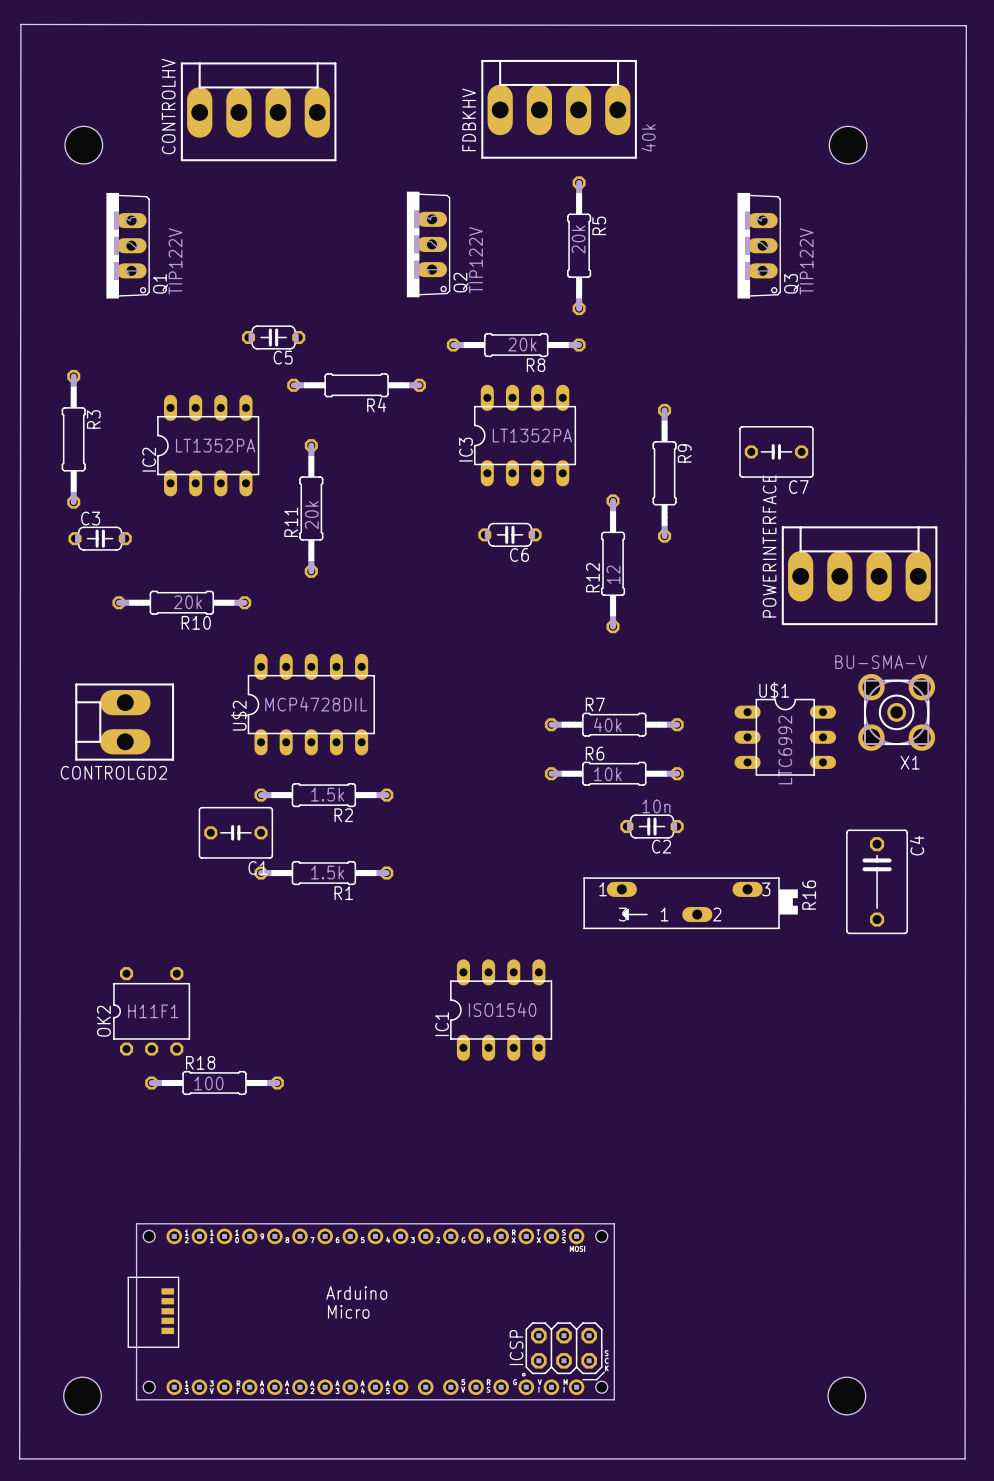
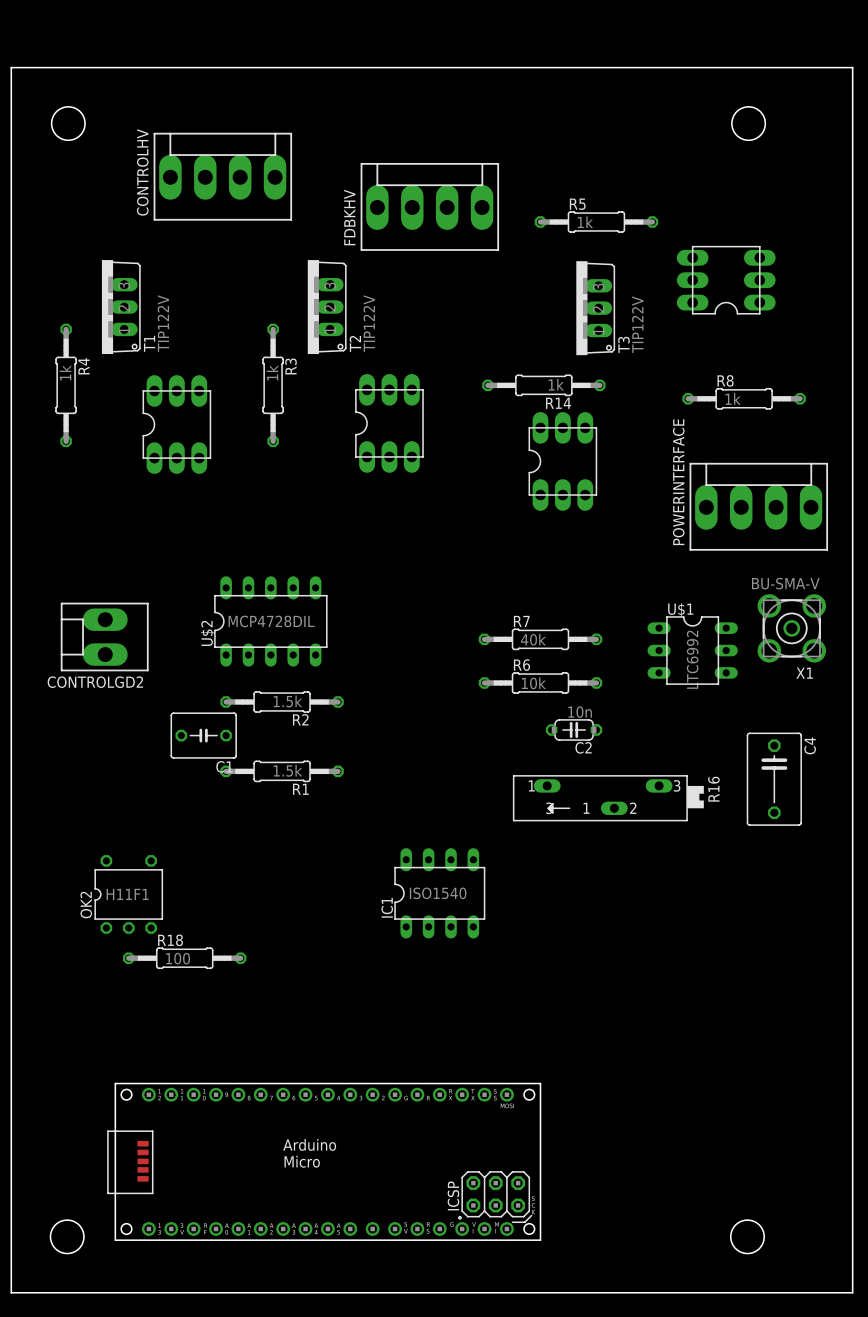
FDBKHV: 40k (559, 109) -> none
CONTROLHV position: (258, 111) -> (222, 176)
R5 name position: R5 (599, 225) -> R5 (577, 204)
FDBKHV: none -> (429, 206)
R5 value: 20k (578, 239) -> 1k (585, 222)
Q2: TIP122V (428, 244) -> none
Q1: TIP122V (128, 245) -> none
R5 rotation: 0° (579, 245) -> 90° clockwise (596, 222)
R5 position: (579, 245) -> (596, 222)
Q3: TIP122V (759, 245) -> none
part: none -> (726, 280)
C5: (273, 337) -> none
R8 value: 20k (522, 344) -> 1k (733, 399)
R8 position: (516, 345) -> (744, 398)
T1: none -> TIP122V (121, 307)
T2: none -> TIP122V (327, 307)
T3: none -> TIP122V (595, 308)
R8 name position: R8 (536, 365) -> R8 (725, 380)
R4 rotation: 0° (356, 385) -> 90° clockwise (66, 385)
R4 position: (356, 385) -> (66, 385)
R4 name position: R4 (376, 405) -> R4 (84, 366)
R4 value: none -> 1k (65, 372)
R3 value: none -> 1k (272, 372)
IC3: LT1352PA (525, 435) -> none
R3 position: (73, 439) -> (273, 385)
R14: none -> 1k (543, 385)
IC2: LT1352PA (208, 445) -> none
C7: (776, 451) -> none
R9: (664, 473) -> none
part: none -> (389, 423)
part: none -> (176, 424)
R11: 20k (311, 508) -> none
part: none -> (562, 461)
C6: (509, 534) -> none
C3: (100, 538) -> none
R12: 12 (613, 563) -> none
R10: 20k (181, 602) -> none
board edge: (19, 1458) (20, 24) (966, 25) (965, 1458) -> (11, 1292) (11, 67) (852, 67) (852, 1292)

